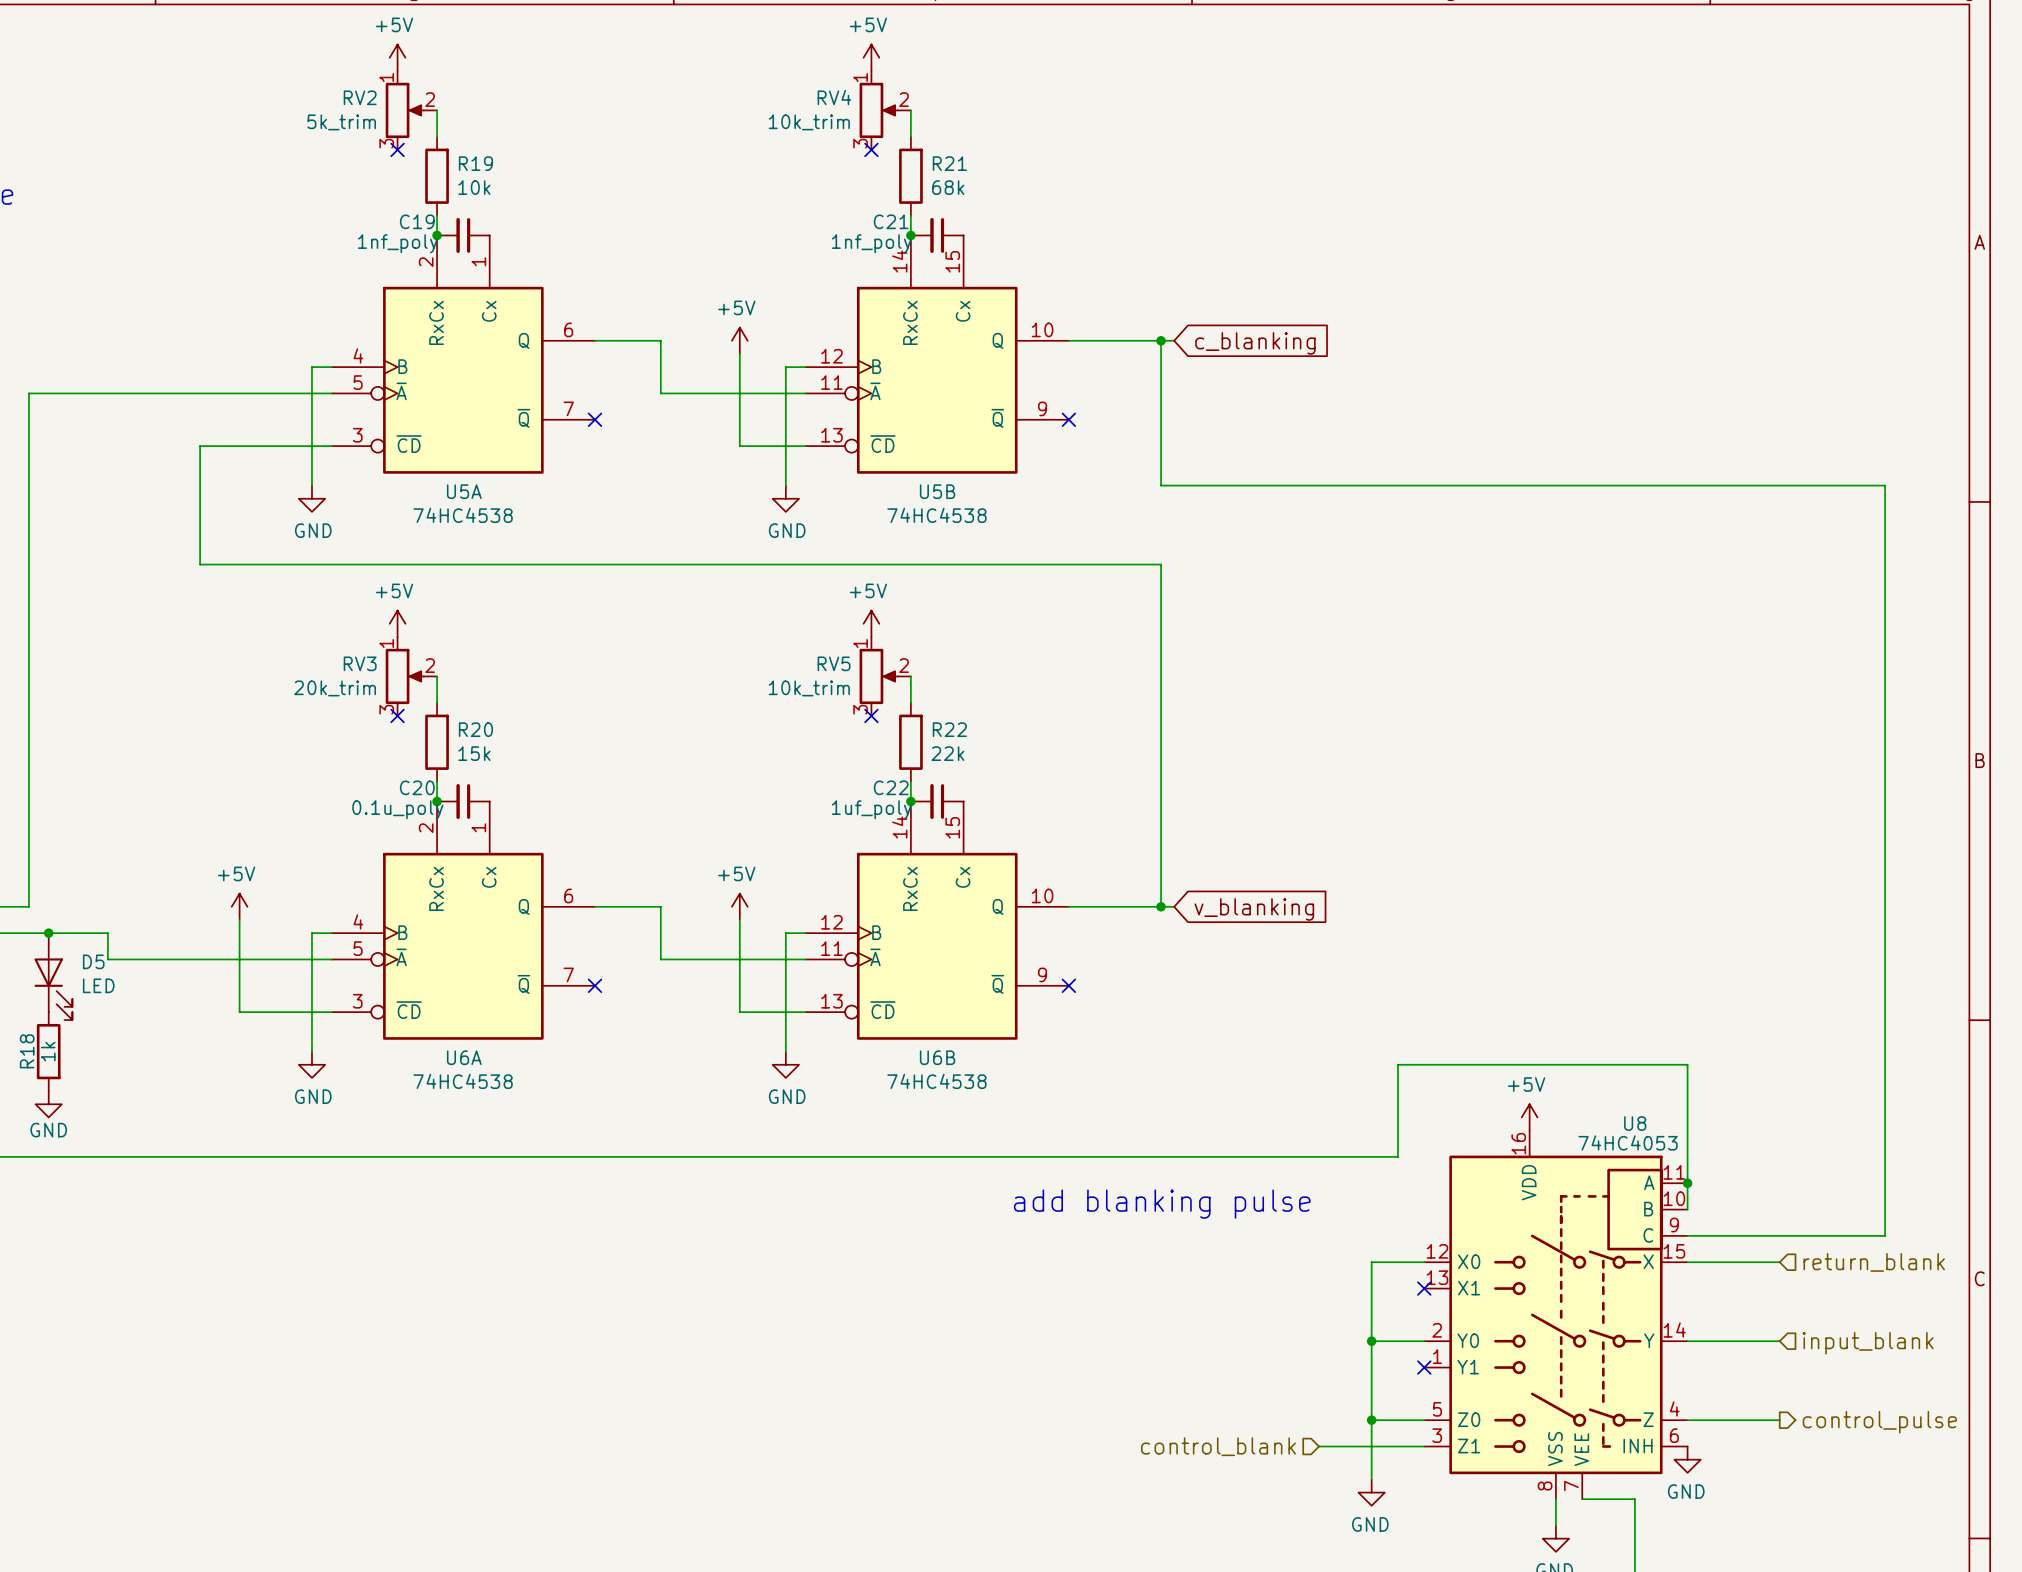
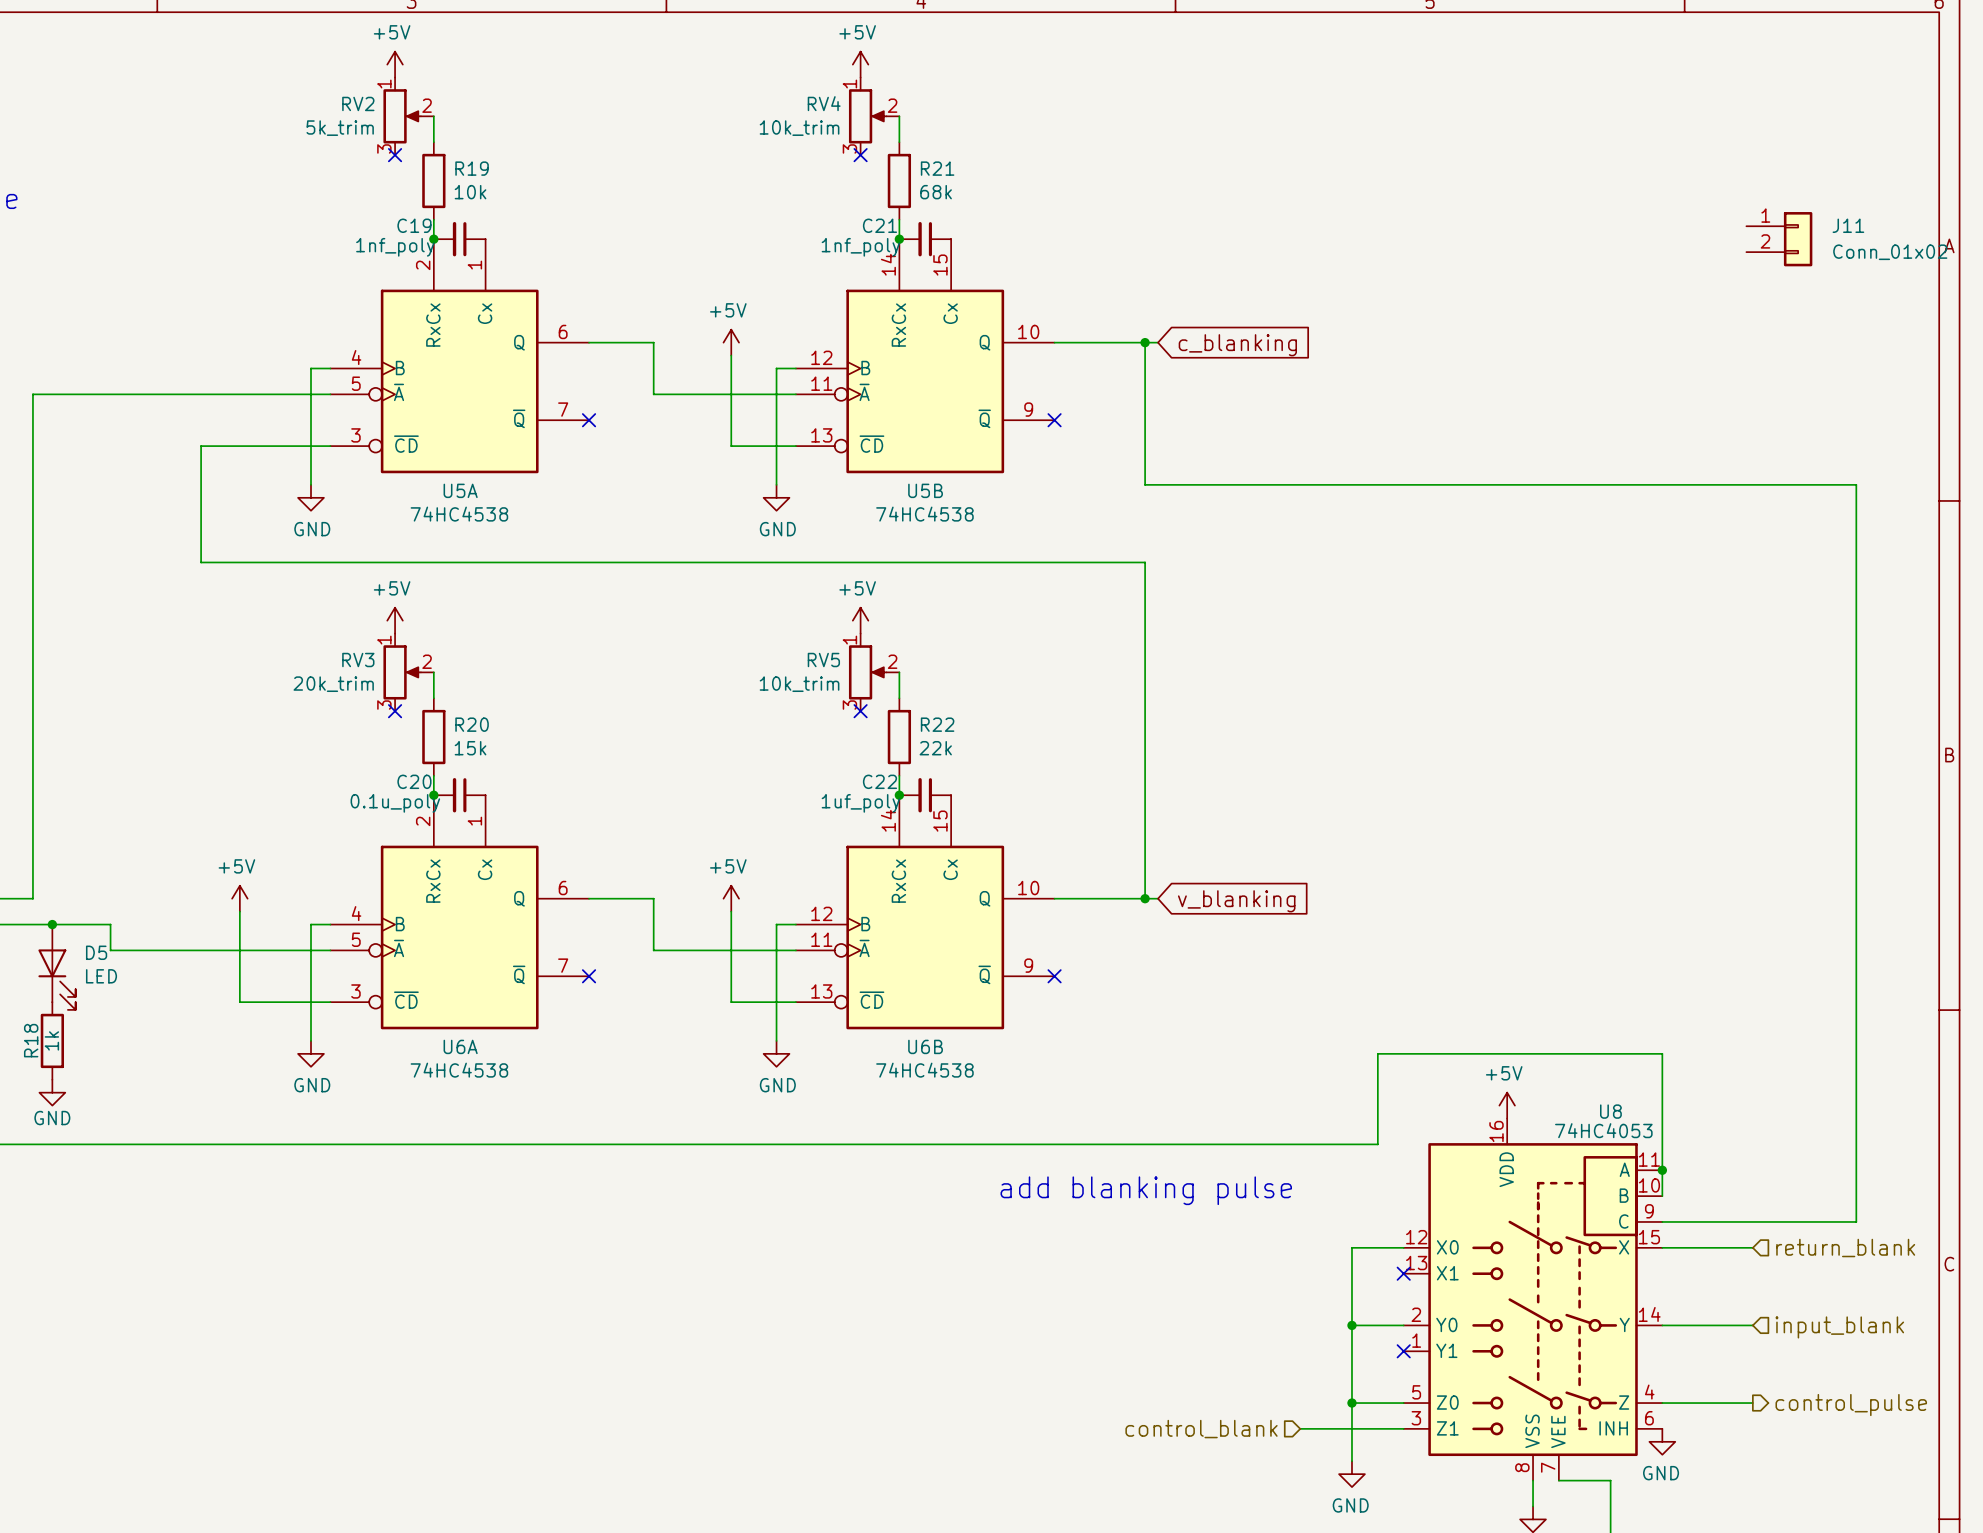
J11: none -> Conn_01x02 (1779, 239)

